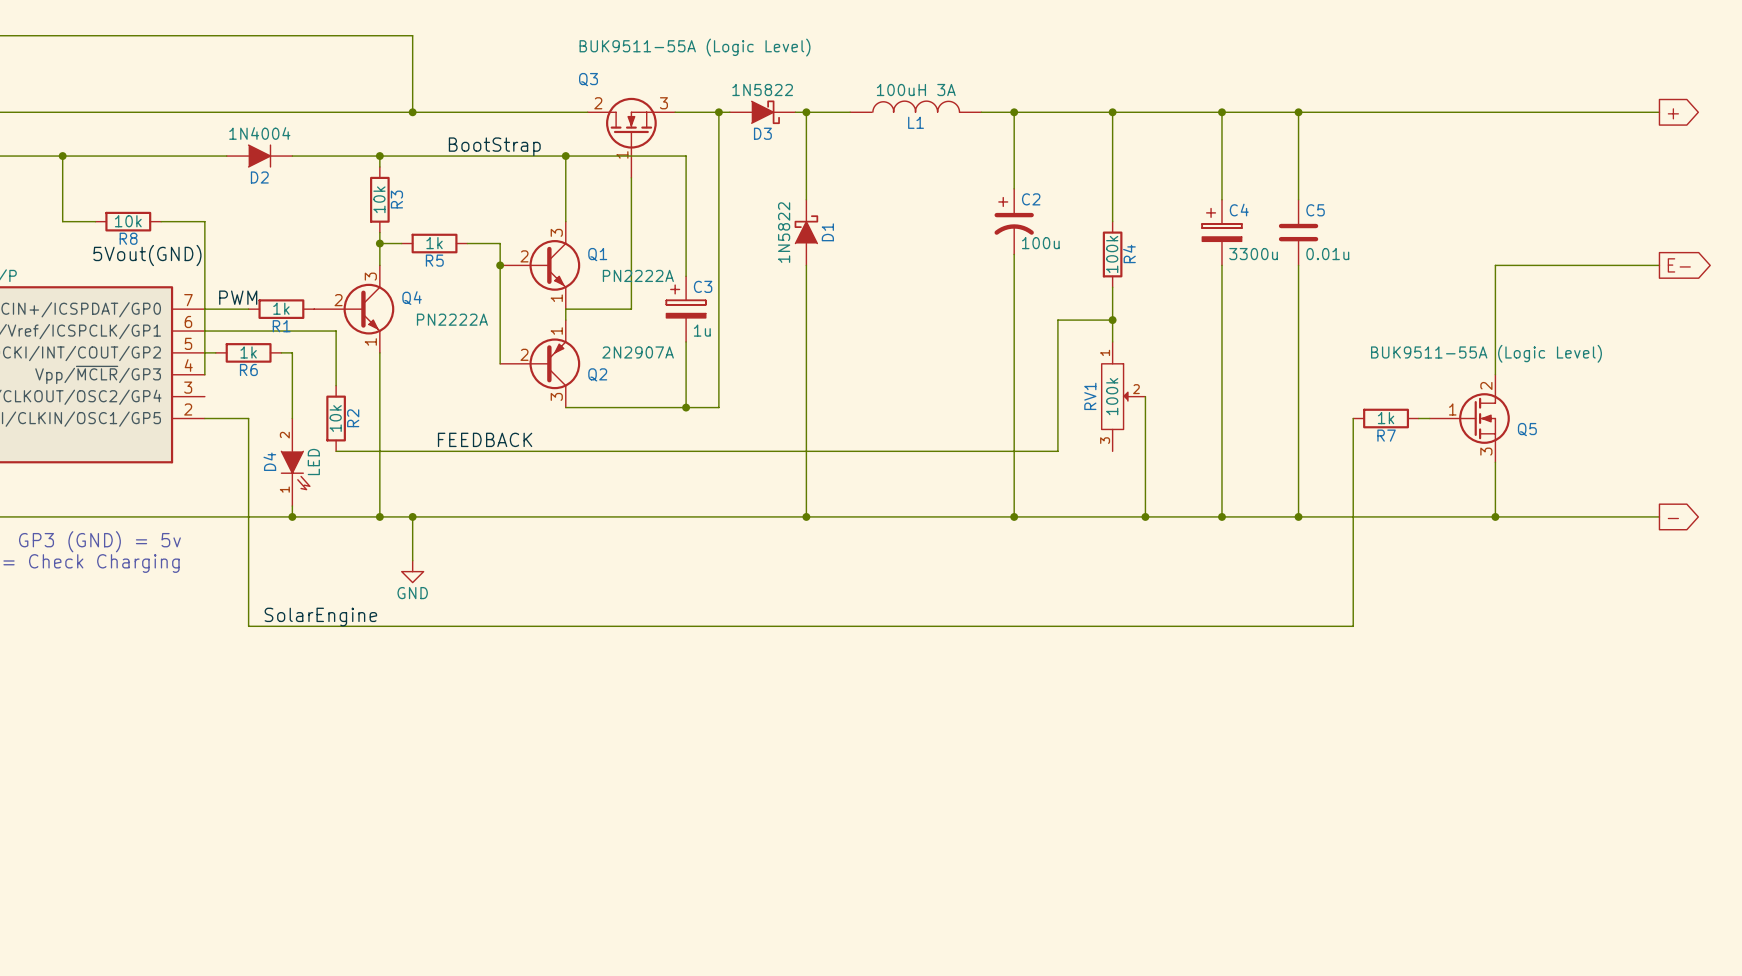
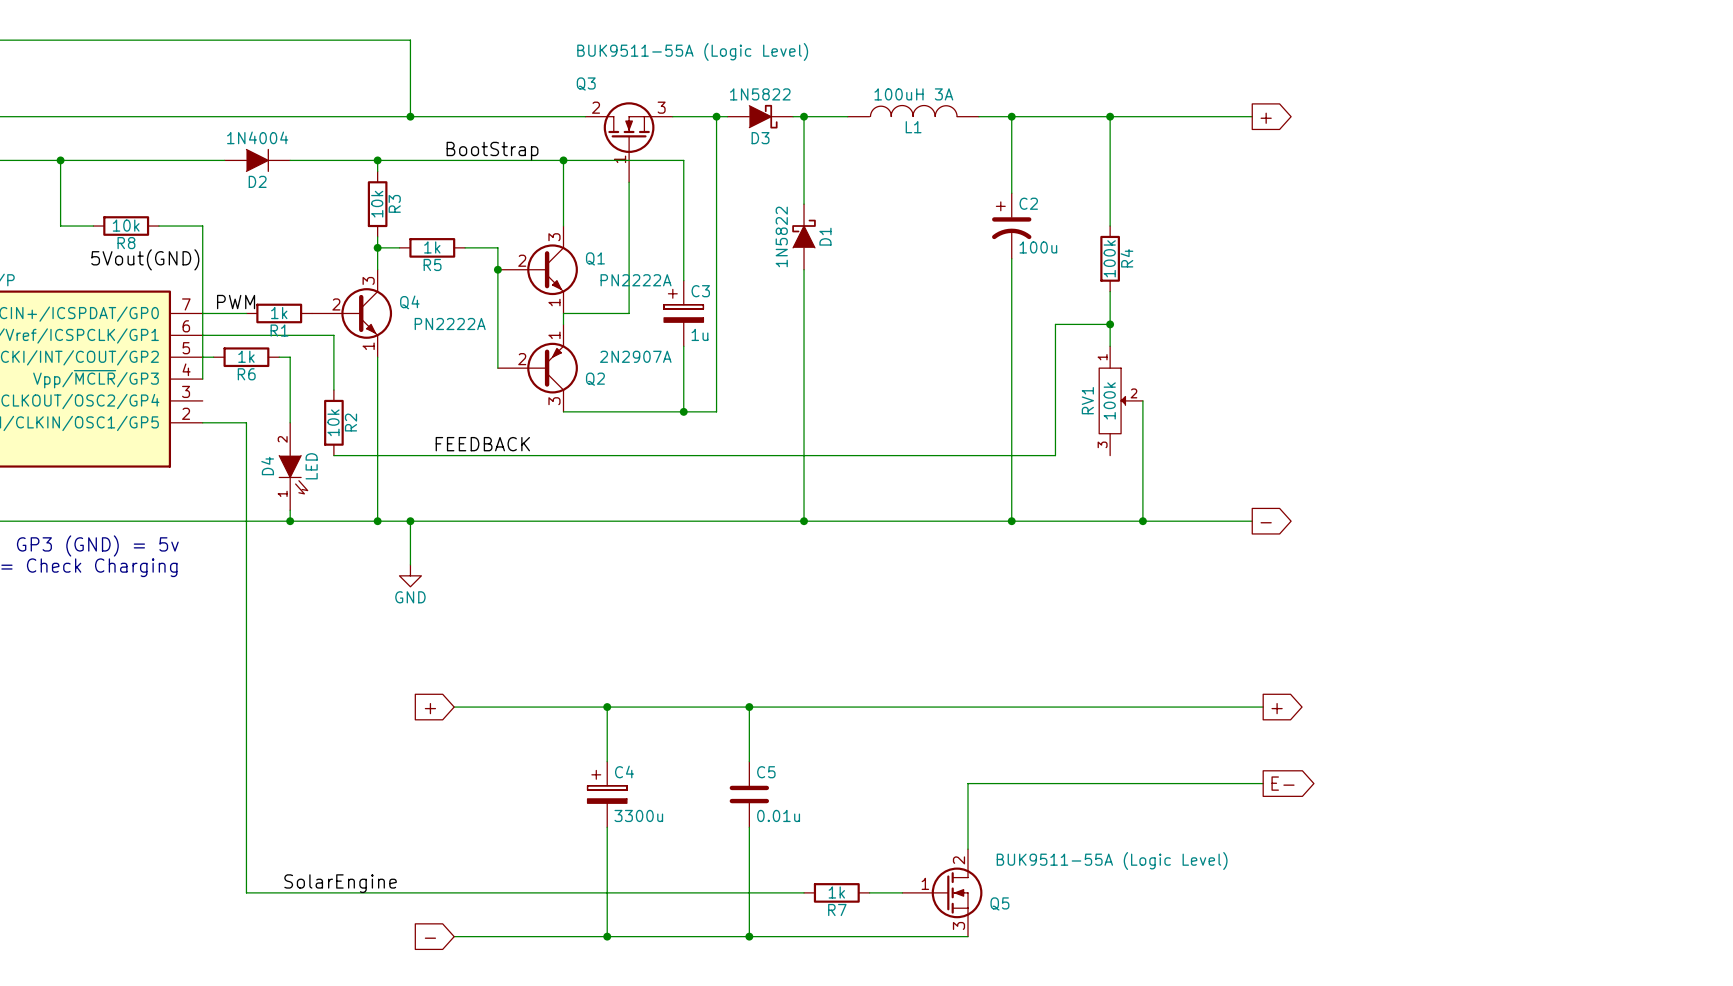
wire: (1221, 112) (1221, 199) -> none
junction: (1221, 112) -> none
wire: (1254, 112) (1659, 112) -> none
wire: (1298, 112) (1298, 199) -> none
junction: (1298, 112) -> none
global label: none -> + (1266, 118)
global label: + (1673, 113) -> none
C4 position: (1221, 232) -> (607, 794)
C5 position: (1298, 232) -> (749, 794)
wire: (1221, 265) (1221, 516) -> none
wire: (1298, 265) (1298, 516) -> none
wire: (1659, 265) (1495, 265) (1495, 374) -> none
global label: E- (1679, 265) -> none
Q5 value position: BUK9511-55A (Logic Level) (1486, 353) -> BUK9511-55A (Logic Level) (1112, 861)
wire: (1353, 418) (1353, 626) (248, 626) -> (804, 892) (246, 892) (246, 630)
R7 position: (1386, 418) -> (836, 892)
wire: (1418, 418) (1429, 418) -> none
Q5 position: (1469, 418) -> (942, 892)
wire: (1495, 462) (1495, 516) -> none
junction: (1221, 516) -> none
wire: (1254, 516) (1659, 516) -> none
junction: (1298, 516) -> none
junction: (1495, 516) -> none
global label: none -> - (1266, 522)
global label: - (1673, 518) -> none
label: SolarEngine (320, 617) -> none
wire: none -> (454, 707) (1263, 707)
wire: none -> (607, 707) (607, 761)
junction: none -> (607, 707)
wire: none -> (749, 707) (749, 761)
junction: none -> (749, 707)
global label: none -> + (430, 708)
global label: none -> + (1277, 708)
wire: none -> (1263, 783) (968, 783) (968, 849)
global label: none -> E- (1283, 783)
wire: none -> (607, 827) (607, 936)
wire: none -> (749, 827) (749, 936)
label: none -> SolarEngine (340, 883)
wire: none -> (869, 892) (902, 892)
wire: none -> (454, 936) (968, 936)
junction: none -> (607, 936)
junction: none -> (749, 936)
global label: none -> - (430, 938)

